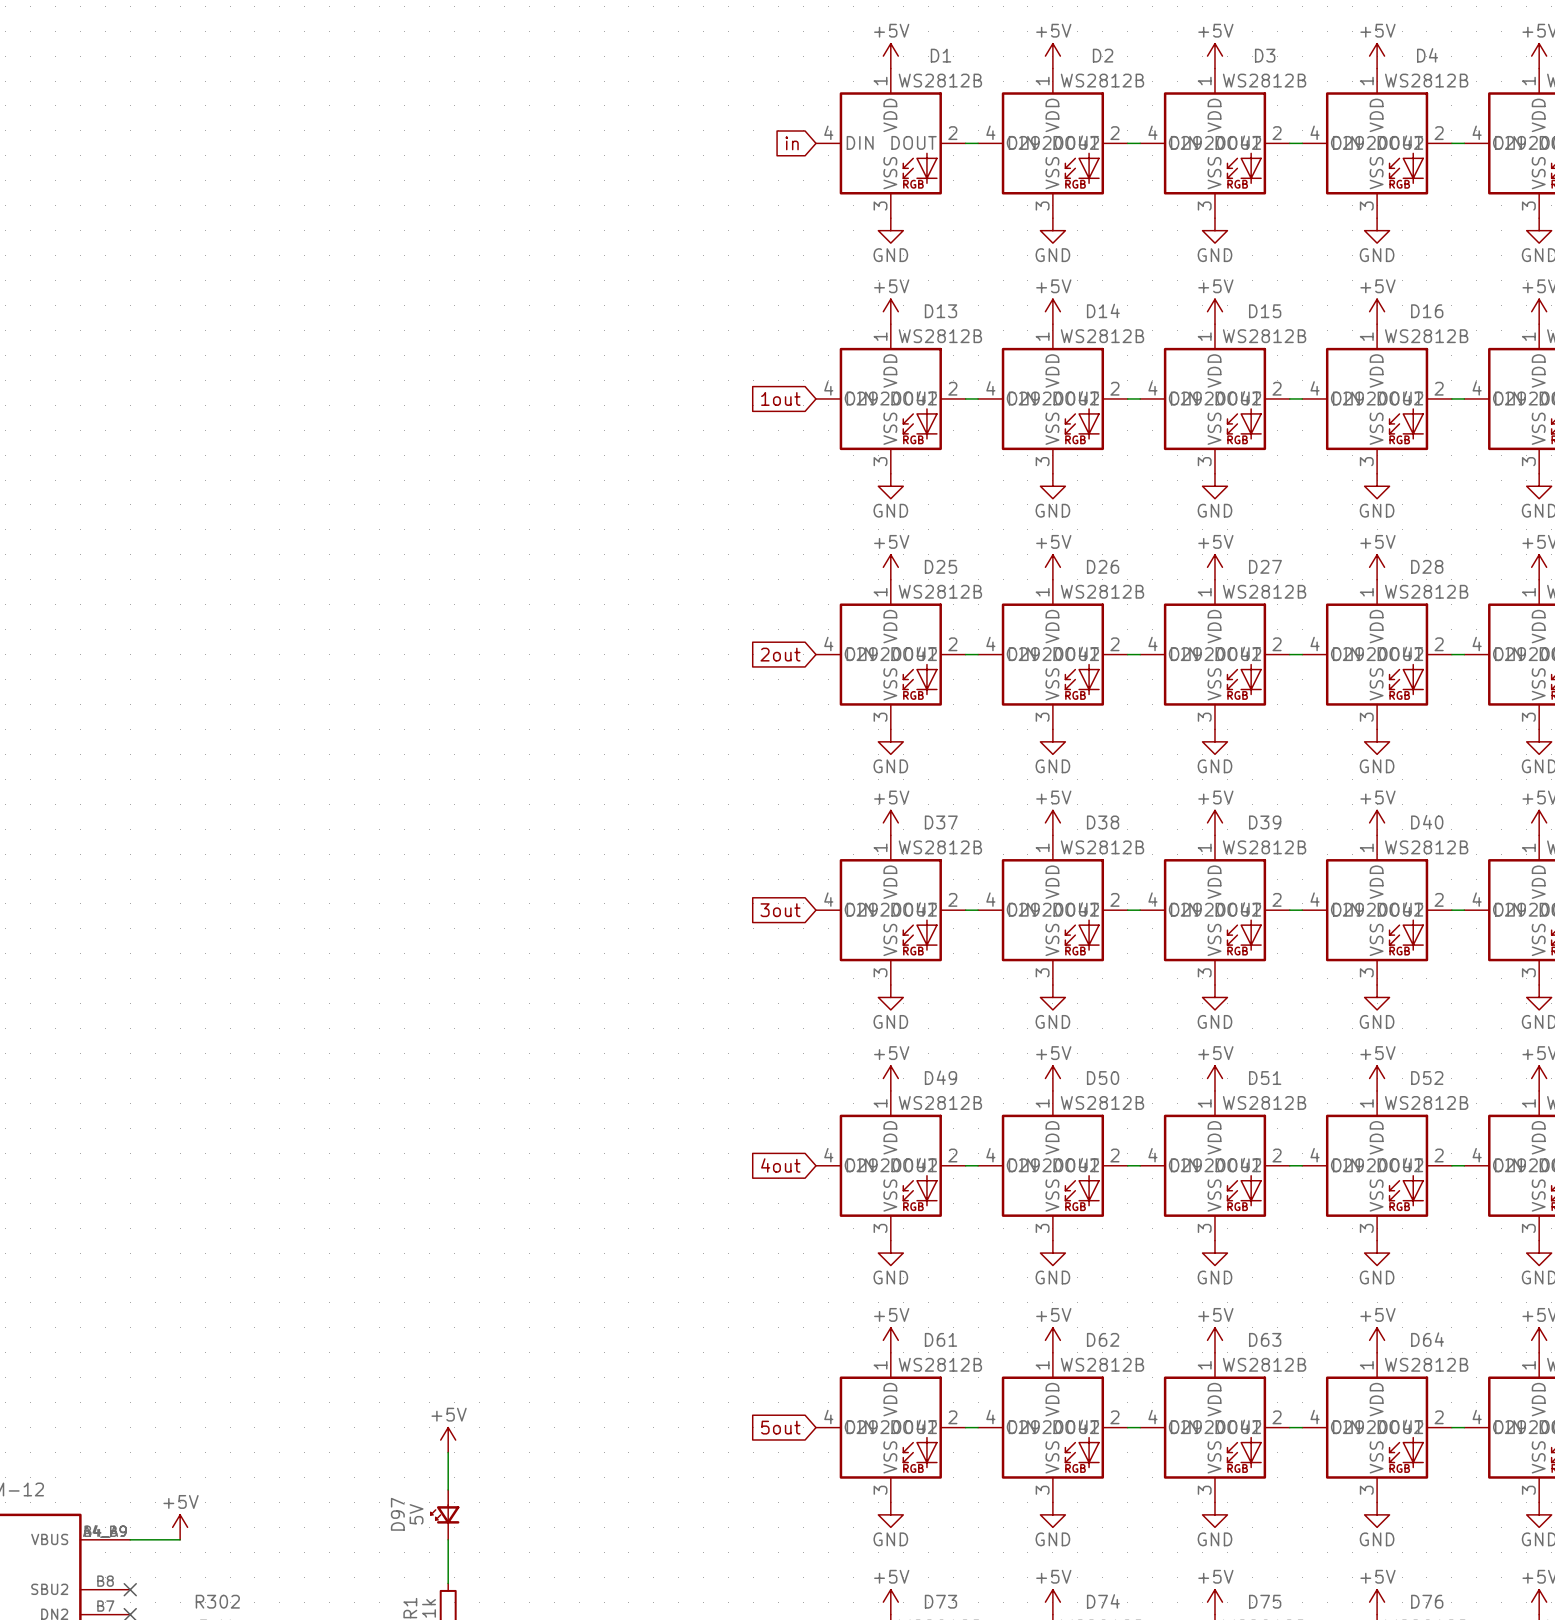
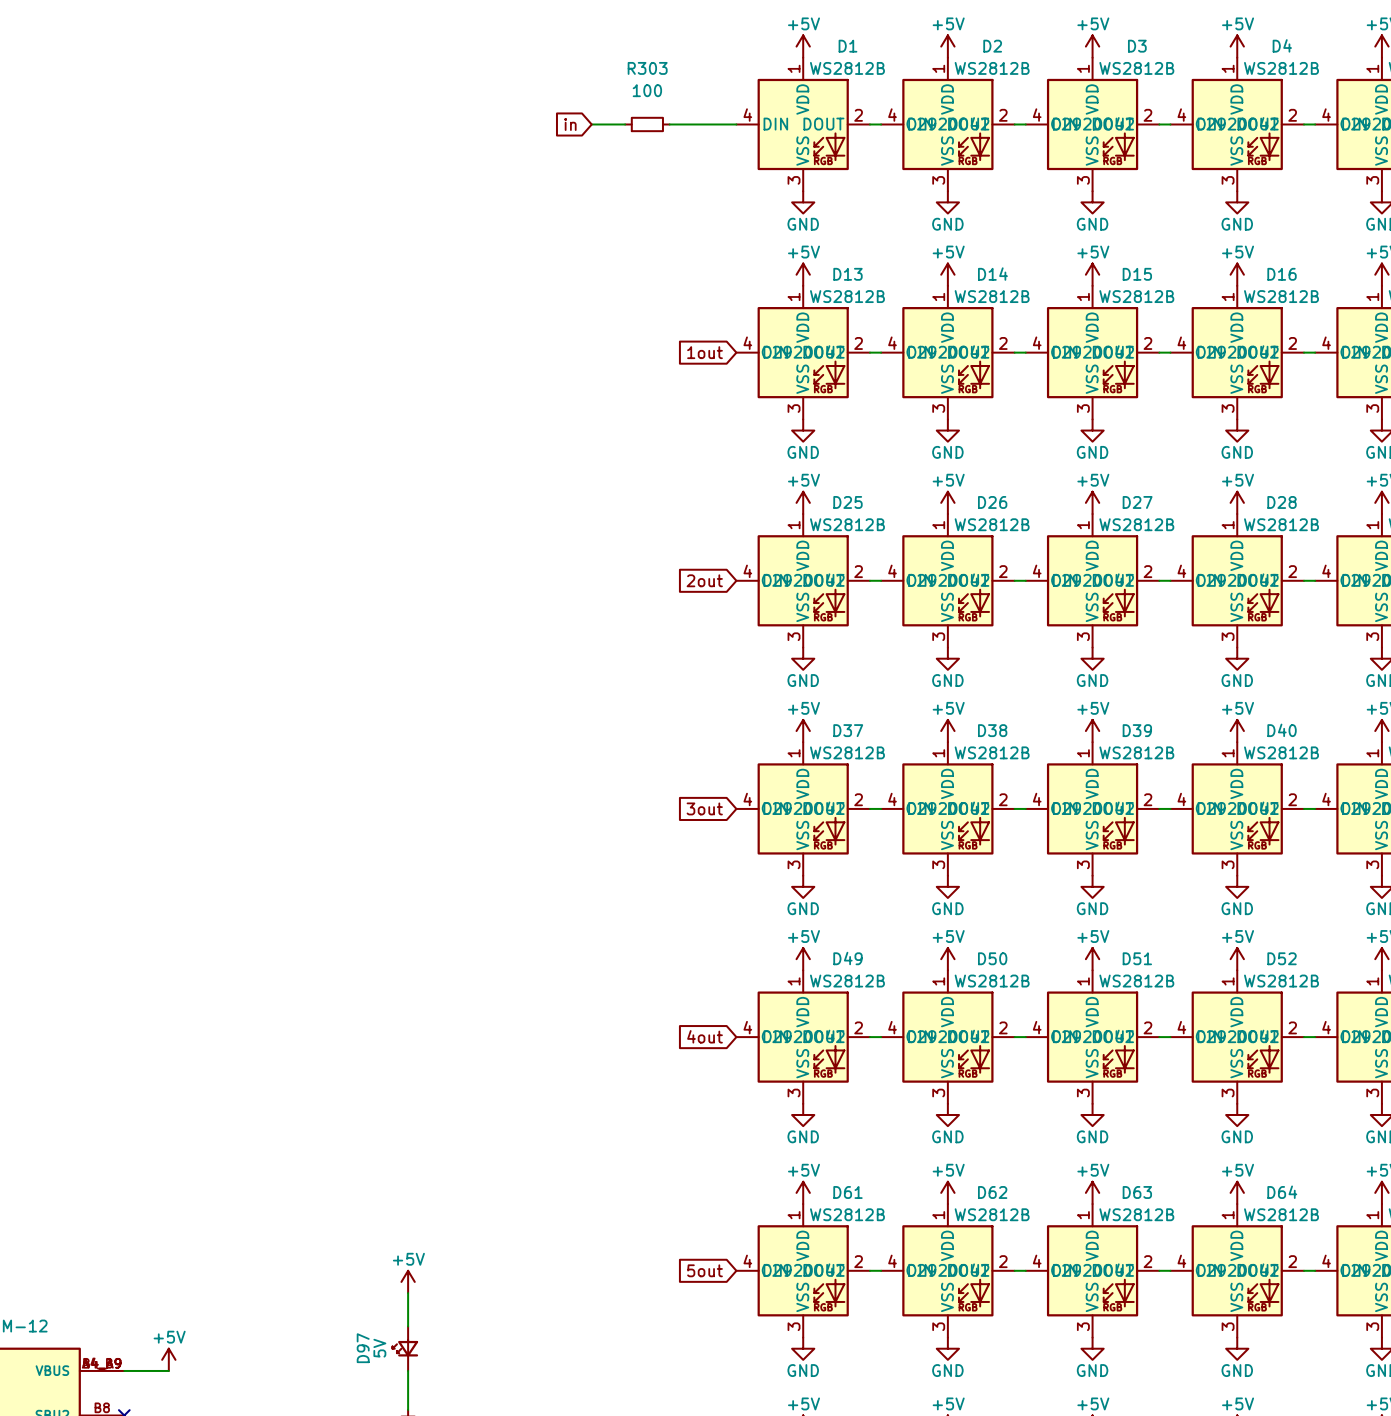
wire: none -> (591, 124) (625, 124)
R303: none -> 100 (647, 124)
wire: none -> (669, 124) (736, 124)
global label position: in (792, 143) -> in (570, 124)

